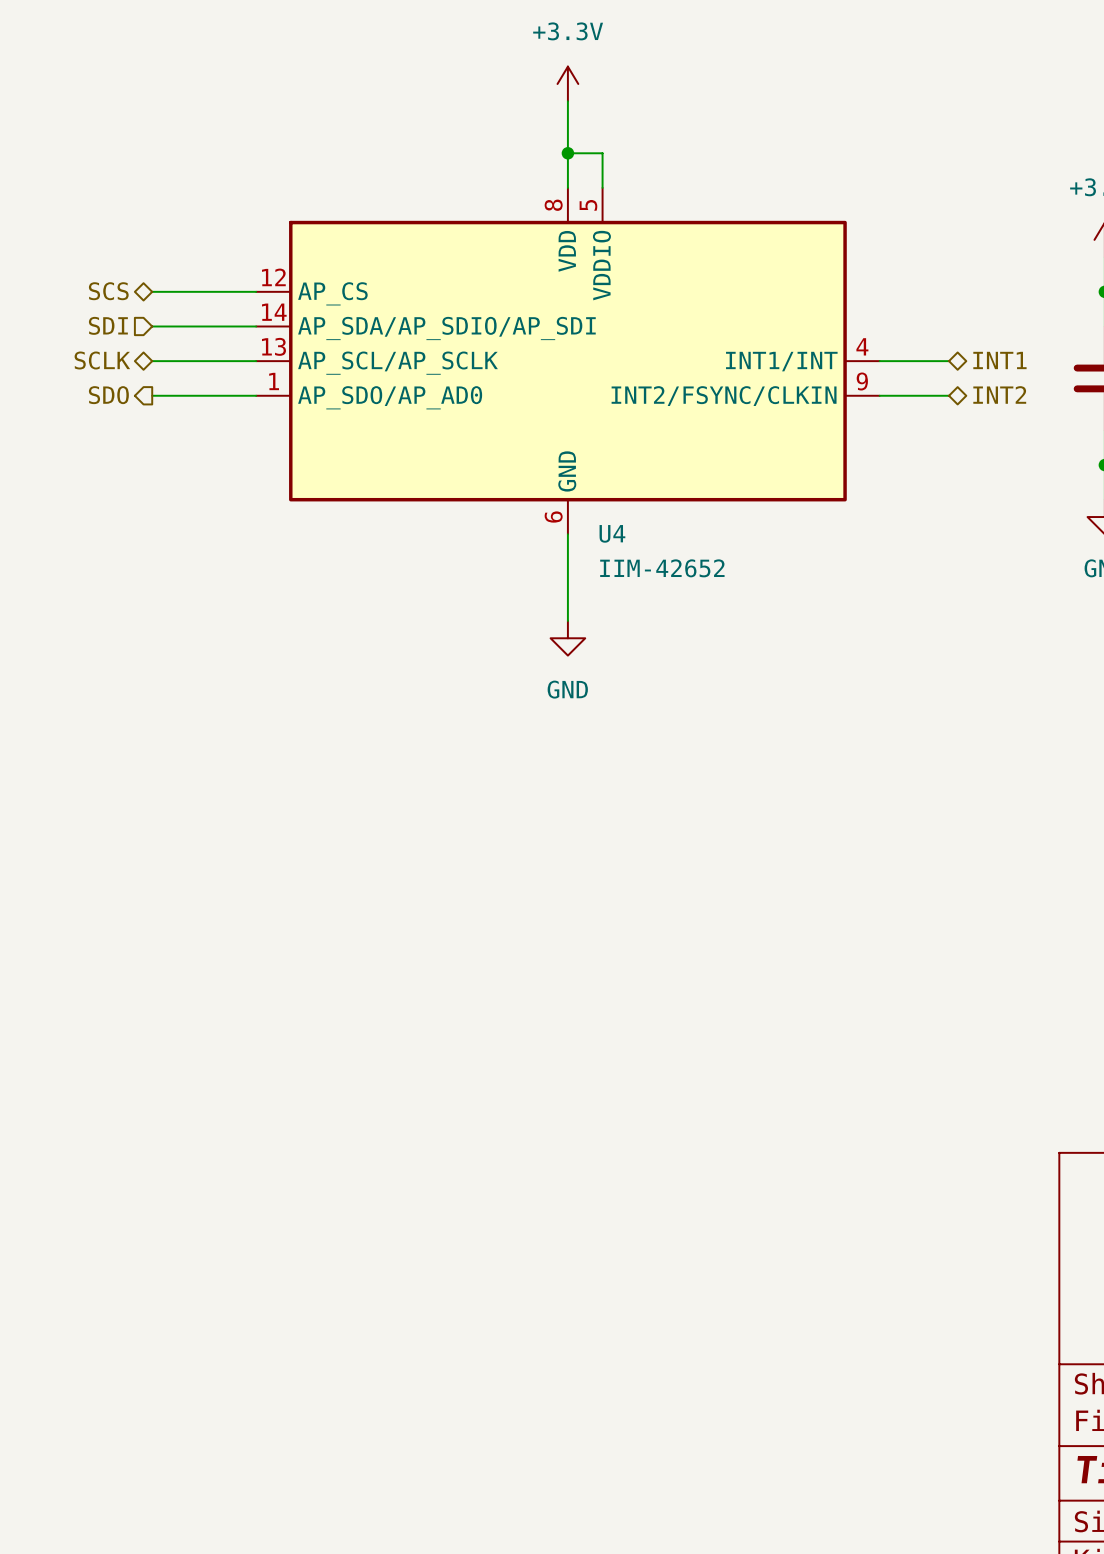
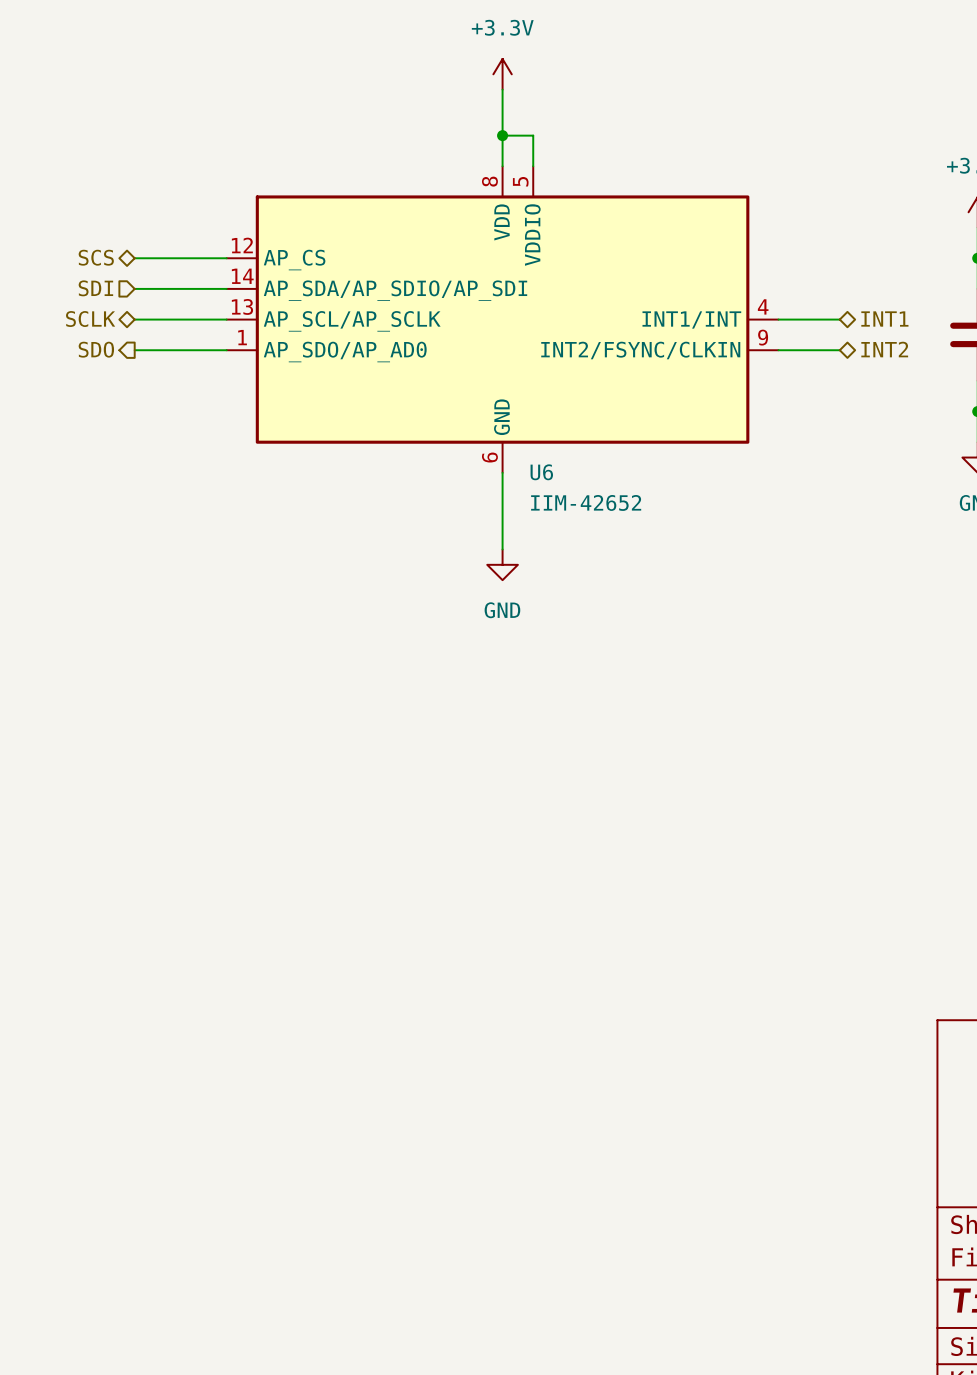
U4 name: U4 (612, 533) -> U6 (541, 472)

